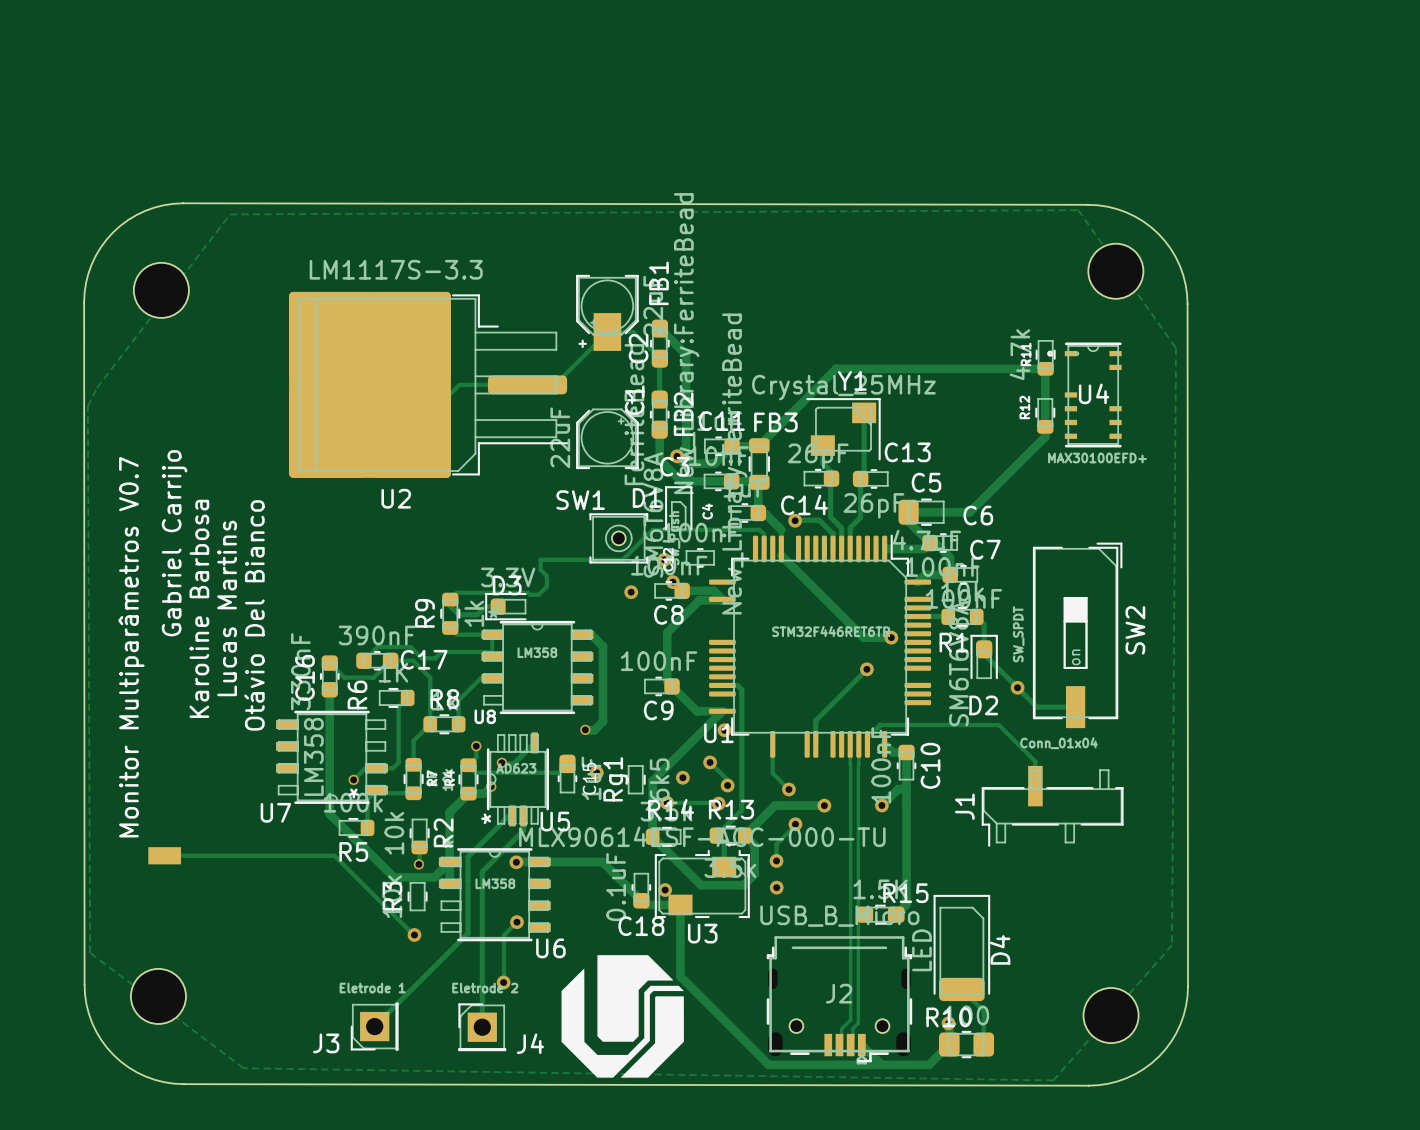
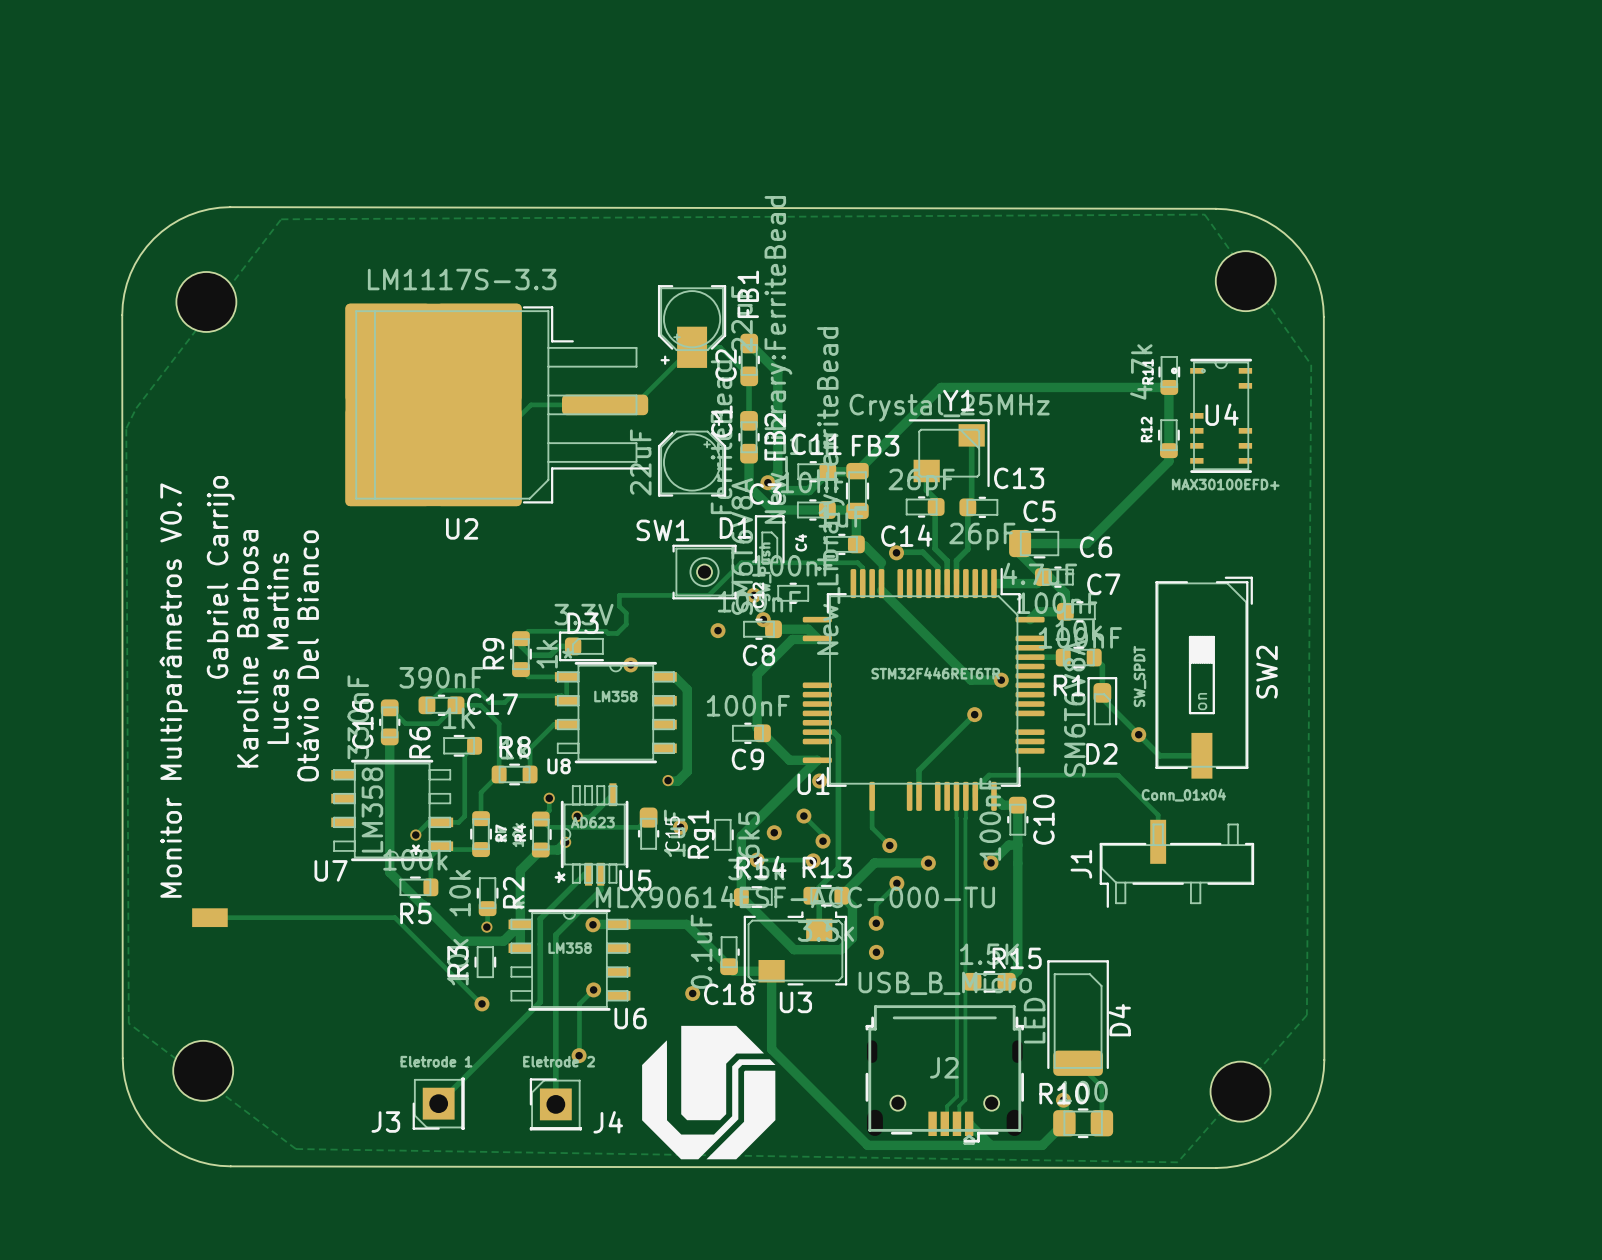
via: none -> (630, 664)
via position: (665, 890) -> (692, 993)

